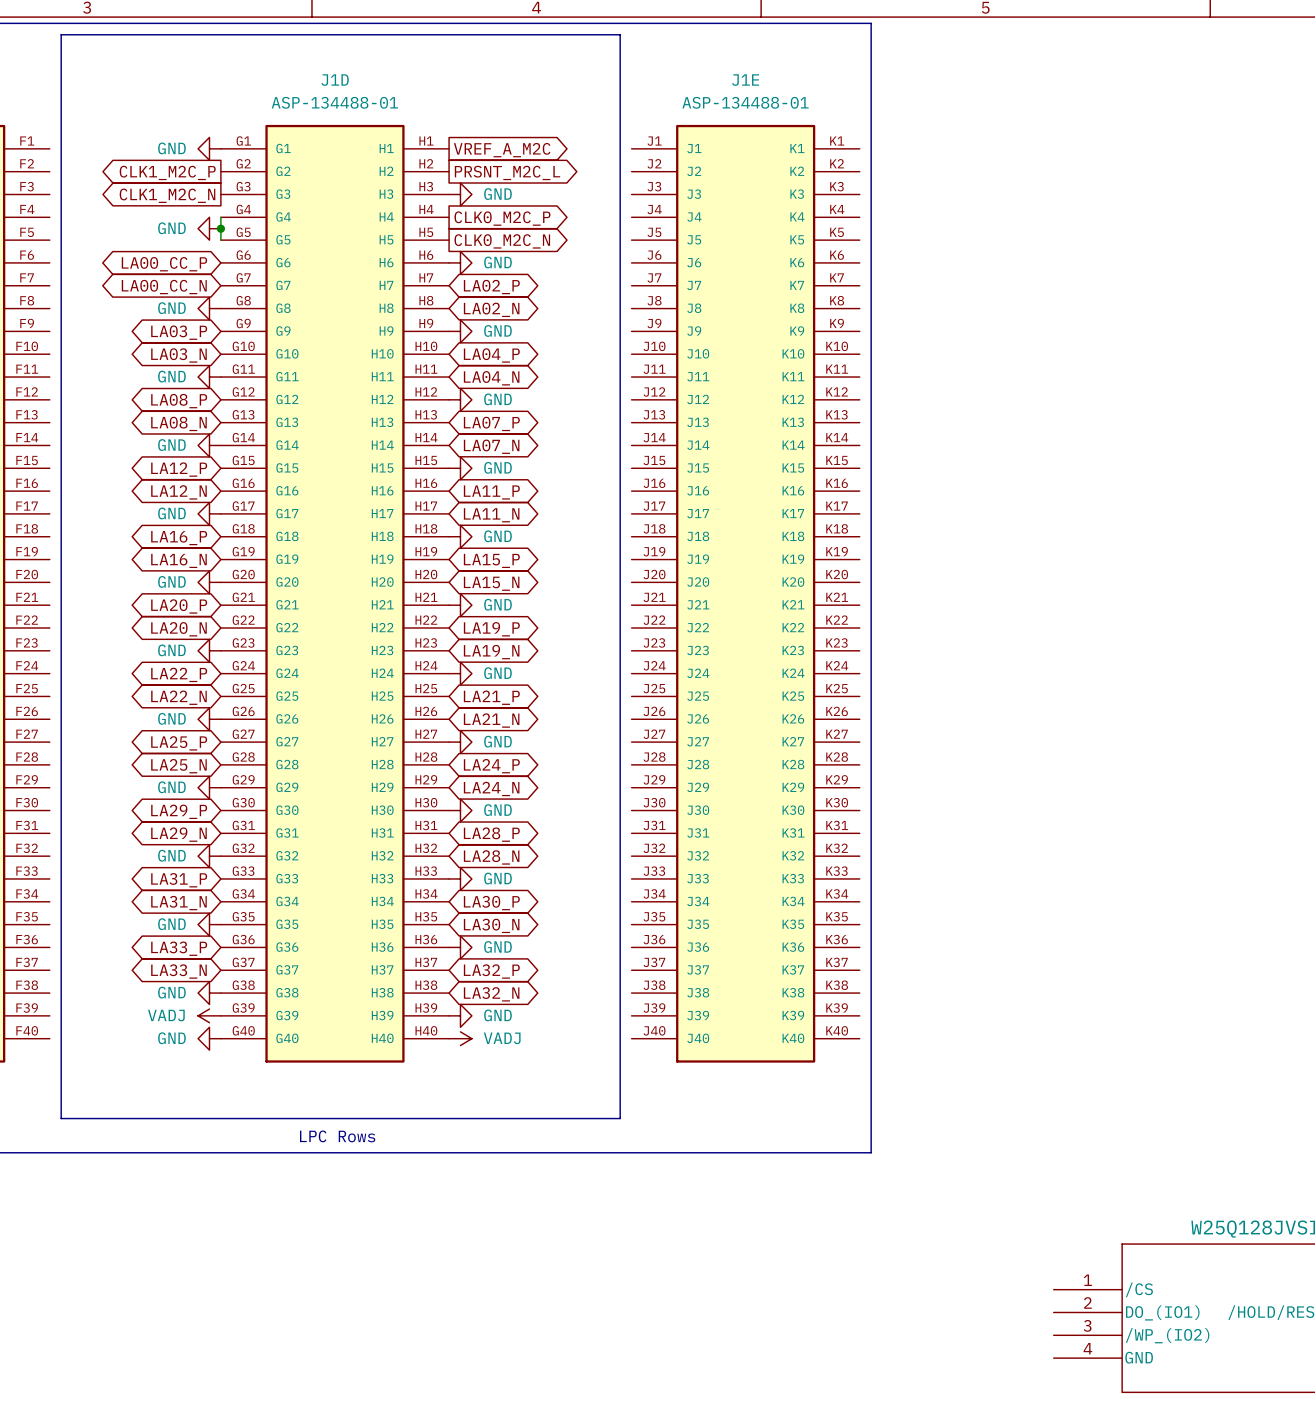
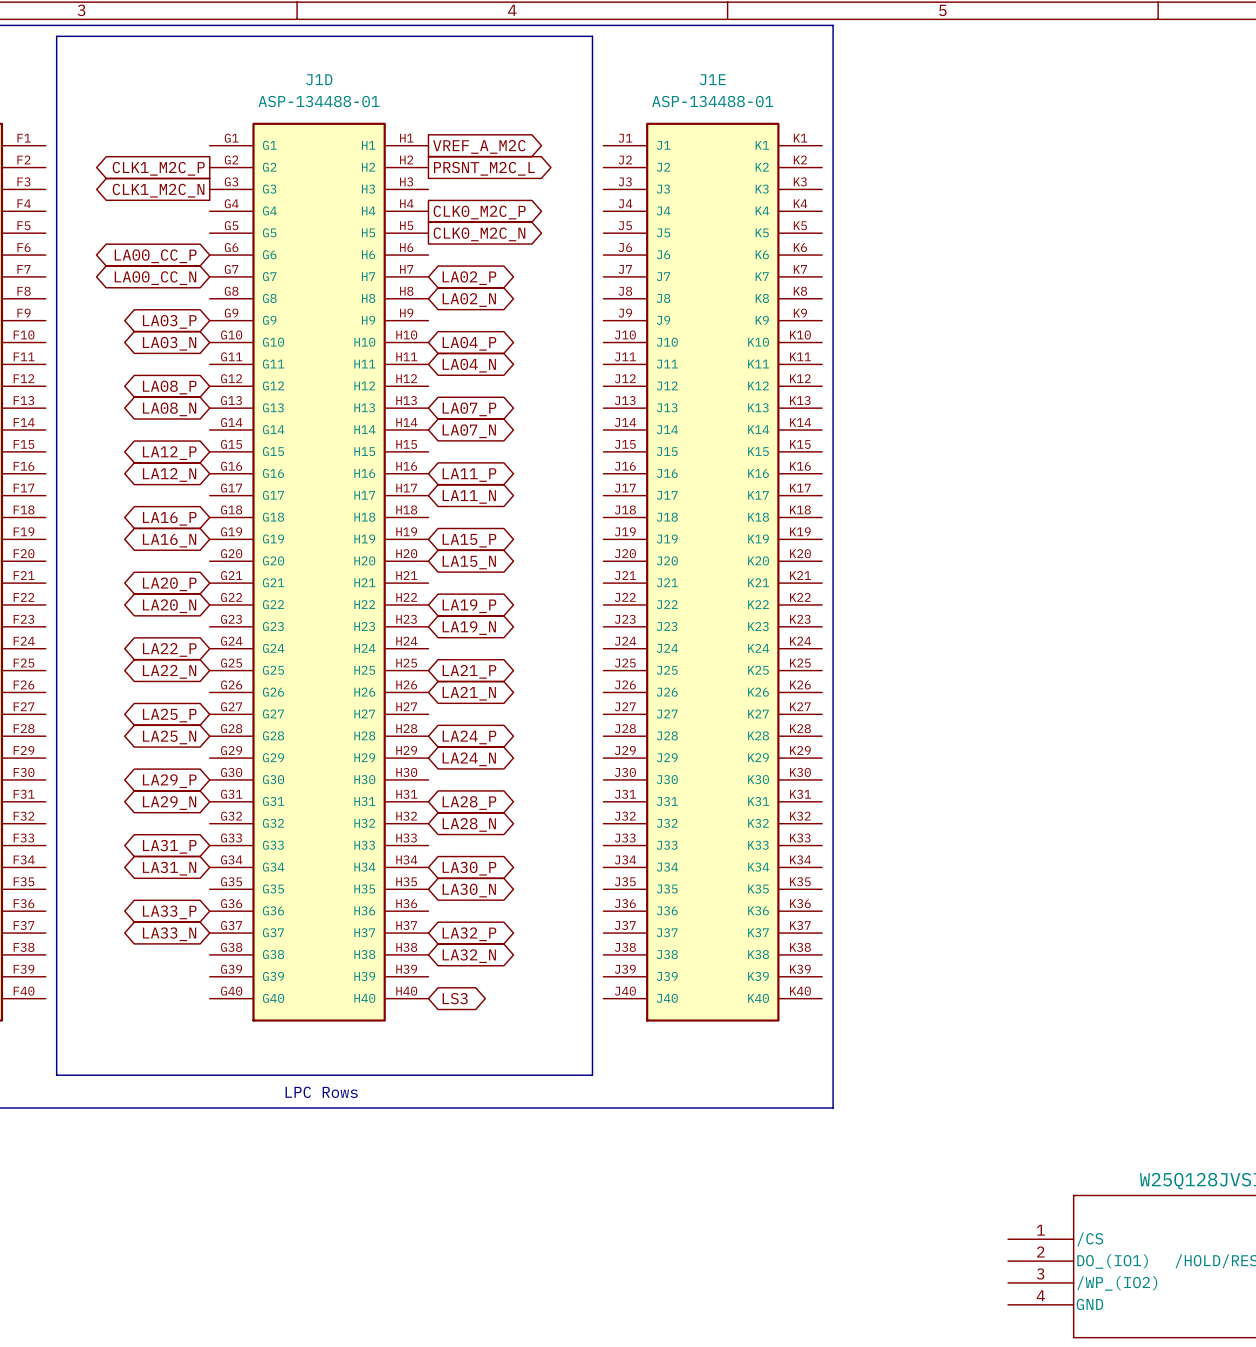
power symbol: GND (209, 148) -> none
power symbol: GND (460, 194) -> none
wire: (220, 217) (220, 240) -> none
power symbol: GND (209, 228) -> none
junction: (220, 228) -> none
power symbol: GND (460, 262) -> none
power symbol: GND (209, 308) -> none
power symbol: GND (460, 331) -> none
power symbol: GND (209, 377) -> none
power symbol: GND (460, 399) -> none
power symbol: GND (209, 445) -> none
power symbol: GND (460, 468) -> none
power symbol: GND (209, 513) -> none
power symbol: GND (460, 536) -> none
power symbol: GND (209, 582) -> none
power symbol: GND (460, 605) -> none
power symbol: GND (209, 650) -> none
power symbol: GND (460, 673) -> none
power symbol: GND (209, 719) -> none
power symbol: GND (460, 742) -> none
power symbol: GND (209, 787) -> none
power symbol: GND (460, 810) -> none
power symbol: GND (209, 856) -> none
power symbol: GND (460, 878) -> none
power symbol: GND (209, 924) -> none
power symbol: GND (460, 947) -> none
power symbol: GND (209, 993) -> none
power symbol: VADJ (209, 1015) -> none
power symbol: GND (460, 1015) -> none
power symbol: GND (209, 1038) -> none
power symbol: VADJ (460, 1038) -> none
global label: none -> LS3 (455, 998)

